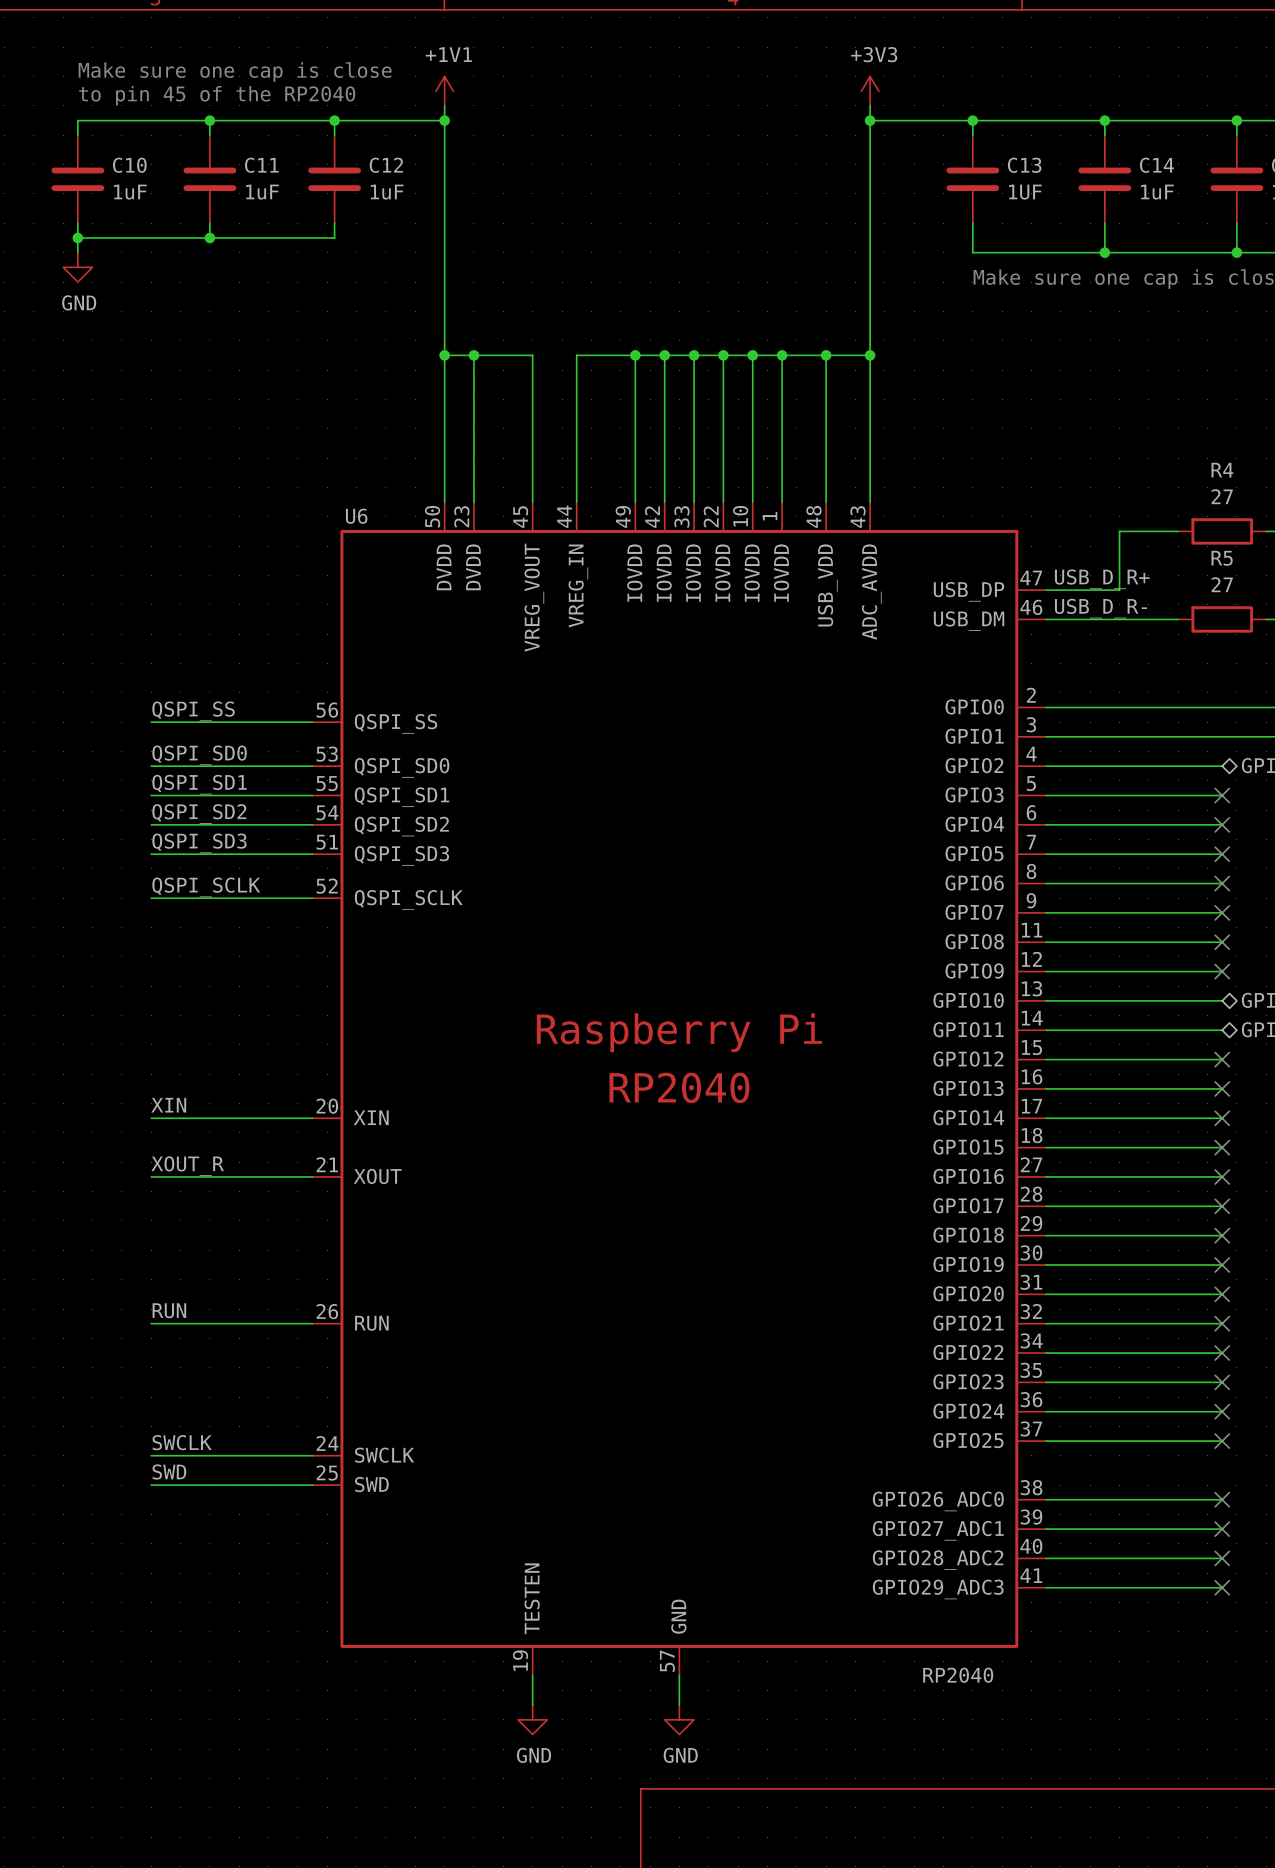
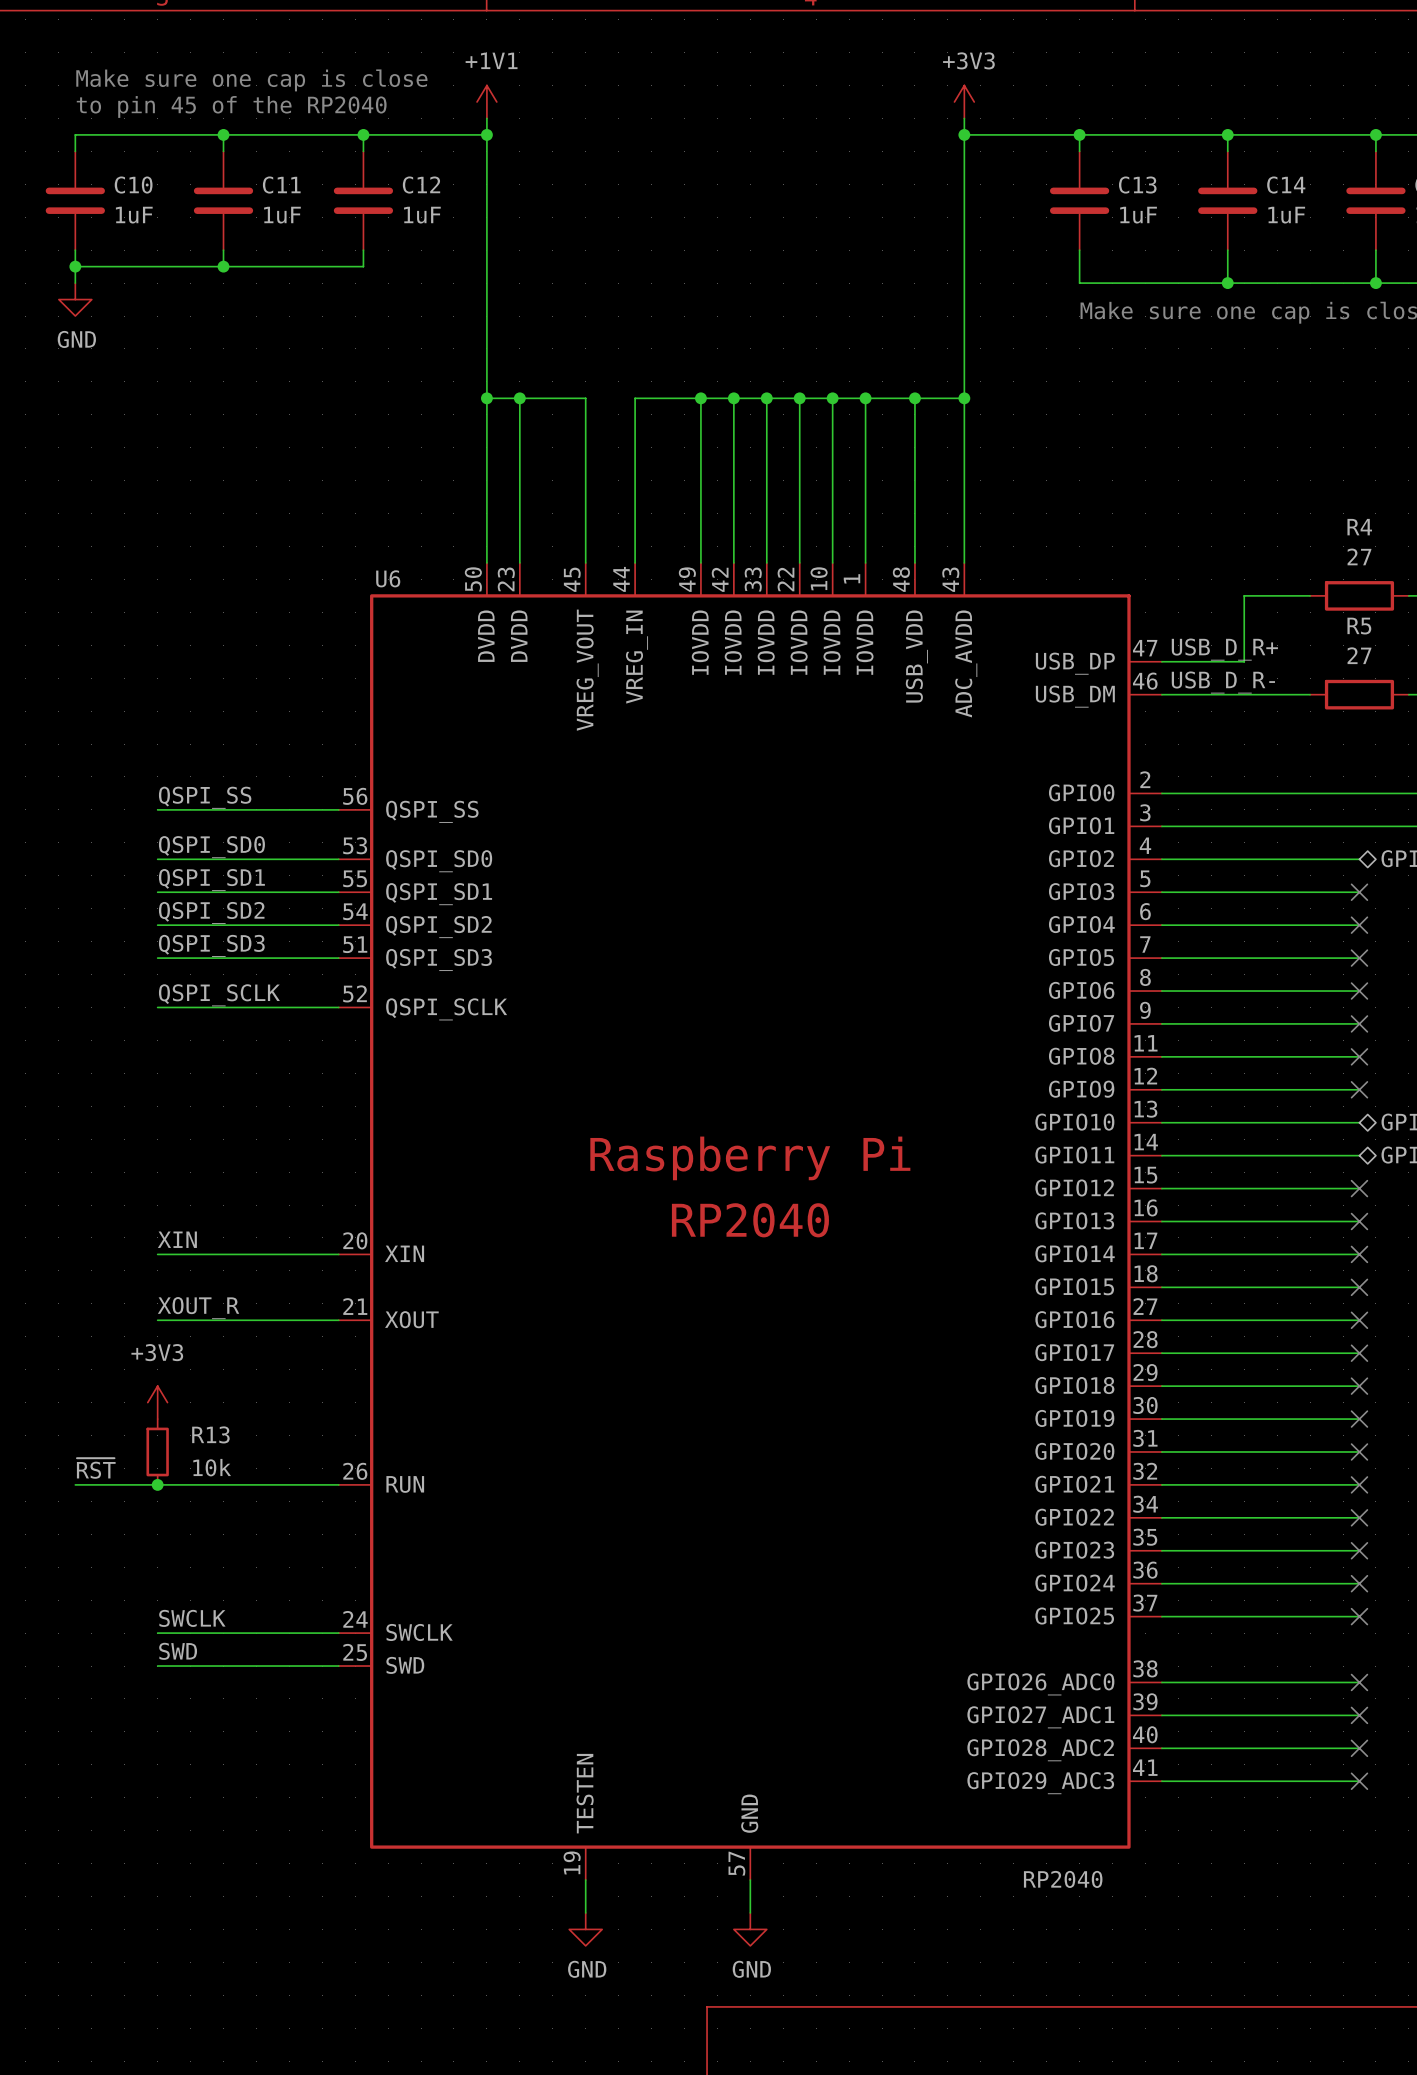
C13 value: 1UF (1025, 192) -> 1uF (1138, 215)
power symbol: none -> +3V3 (157, 1402)
R13: none -> 10k (157, 1451)
label: none -> ~{RST} (96, 1468)
label: RUN (169, 1310) -> none
wire: none -> (75, 1484) (157, 1484)
junction: none -> (157, 1484)

